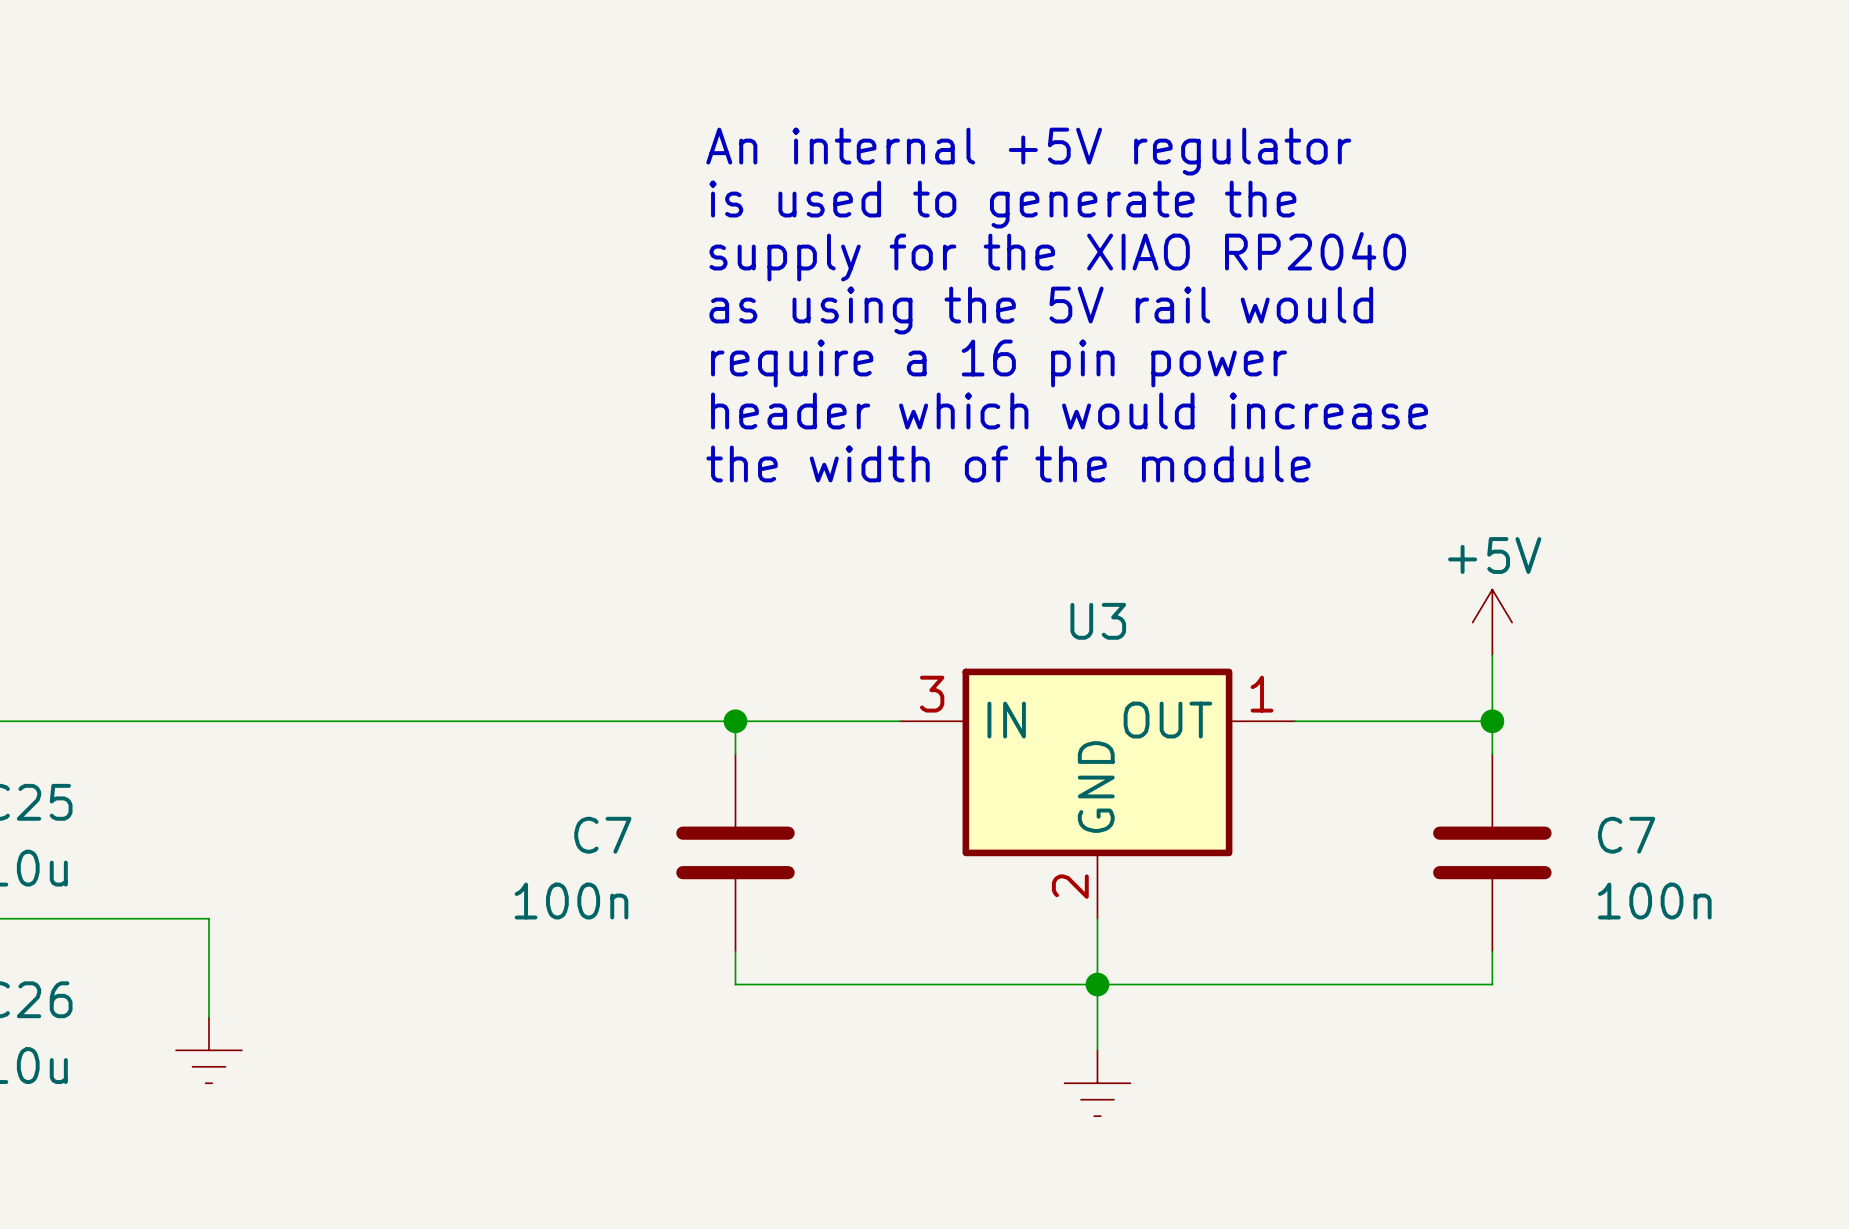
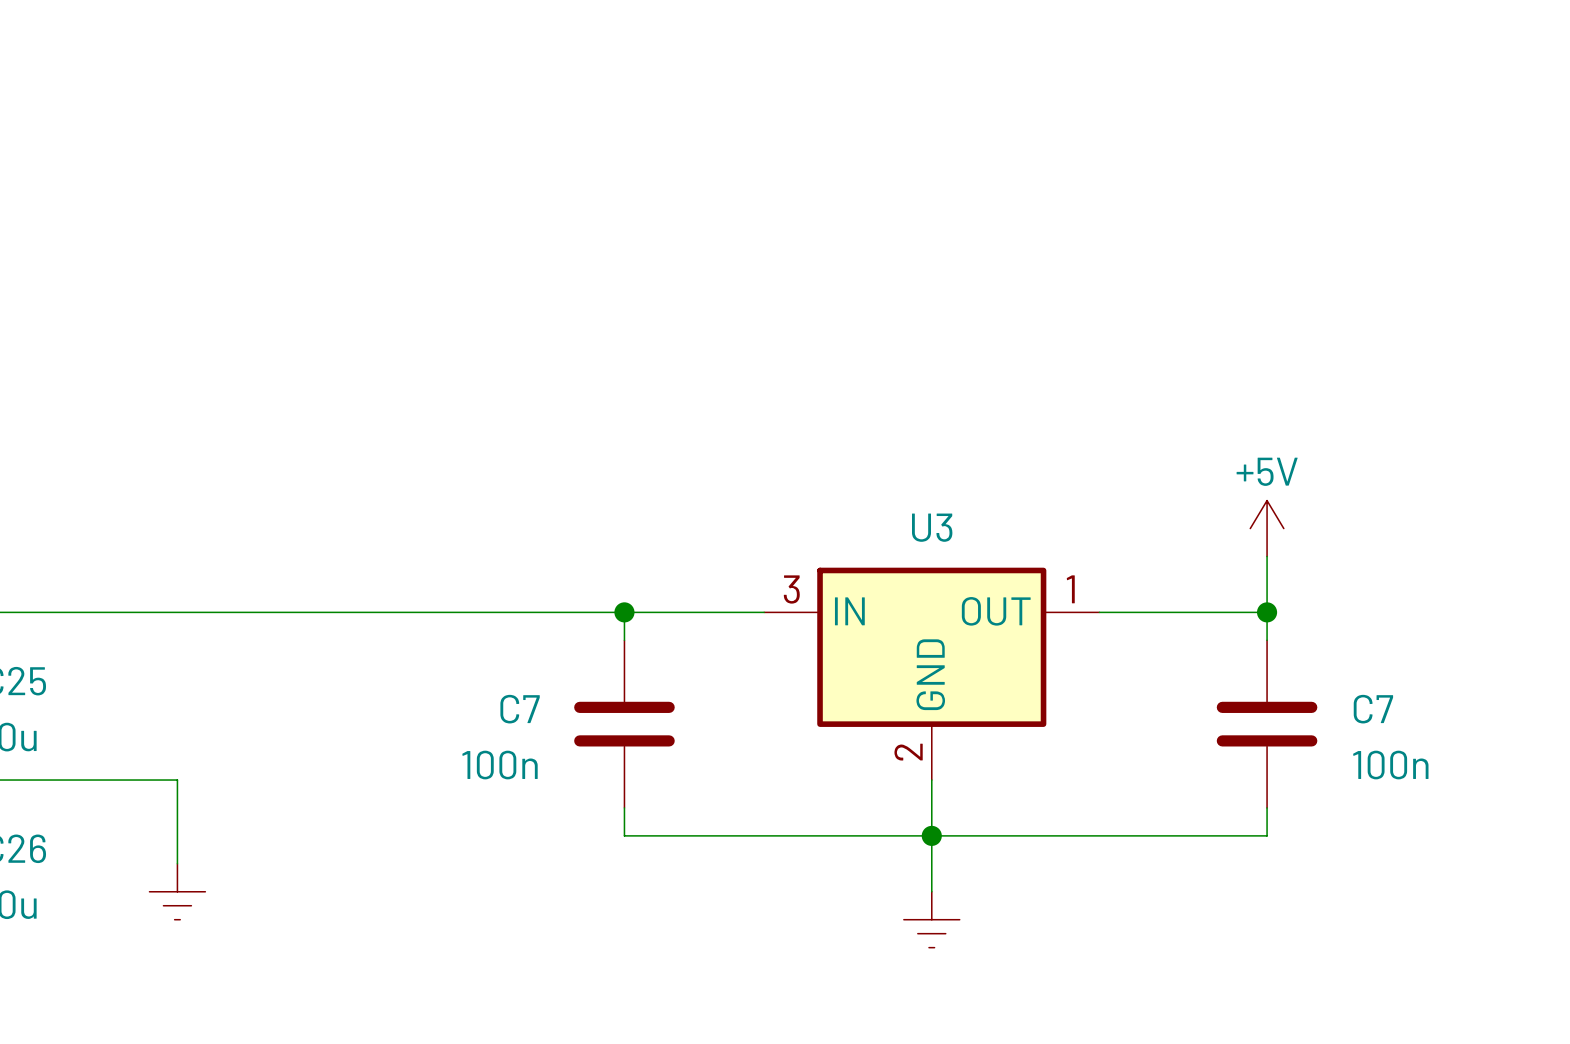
text: An internal +5V regulator (1028, 151) -> none
text: is used to generate the (1002, 204) -> none
text: supply for the XIAO RP2040 (1057, 256) -> none
text: as using the 5V rail would (1041, 310) -> none
text: require a 16 pin power (999, 363) -> none
text: header which would increase (1069, 410) -> none
text: the width of the module (1008, 463) -> none

